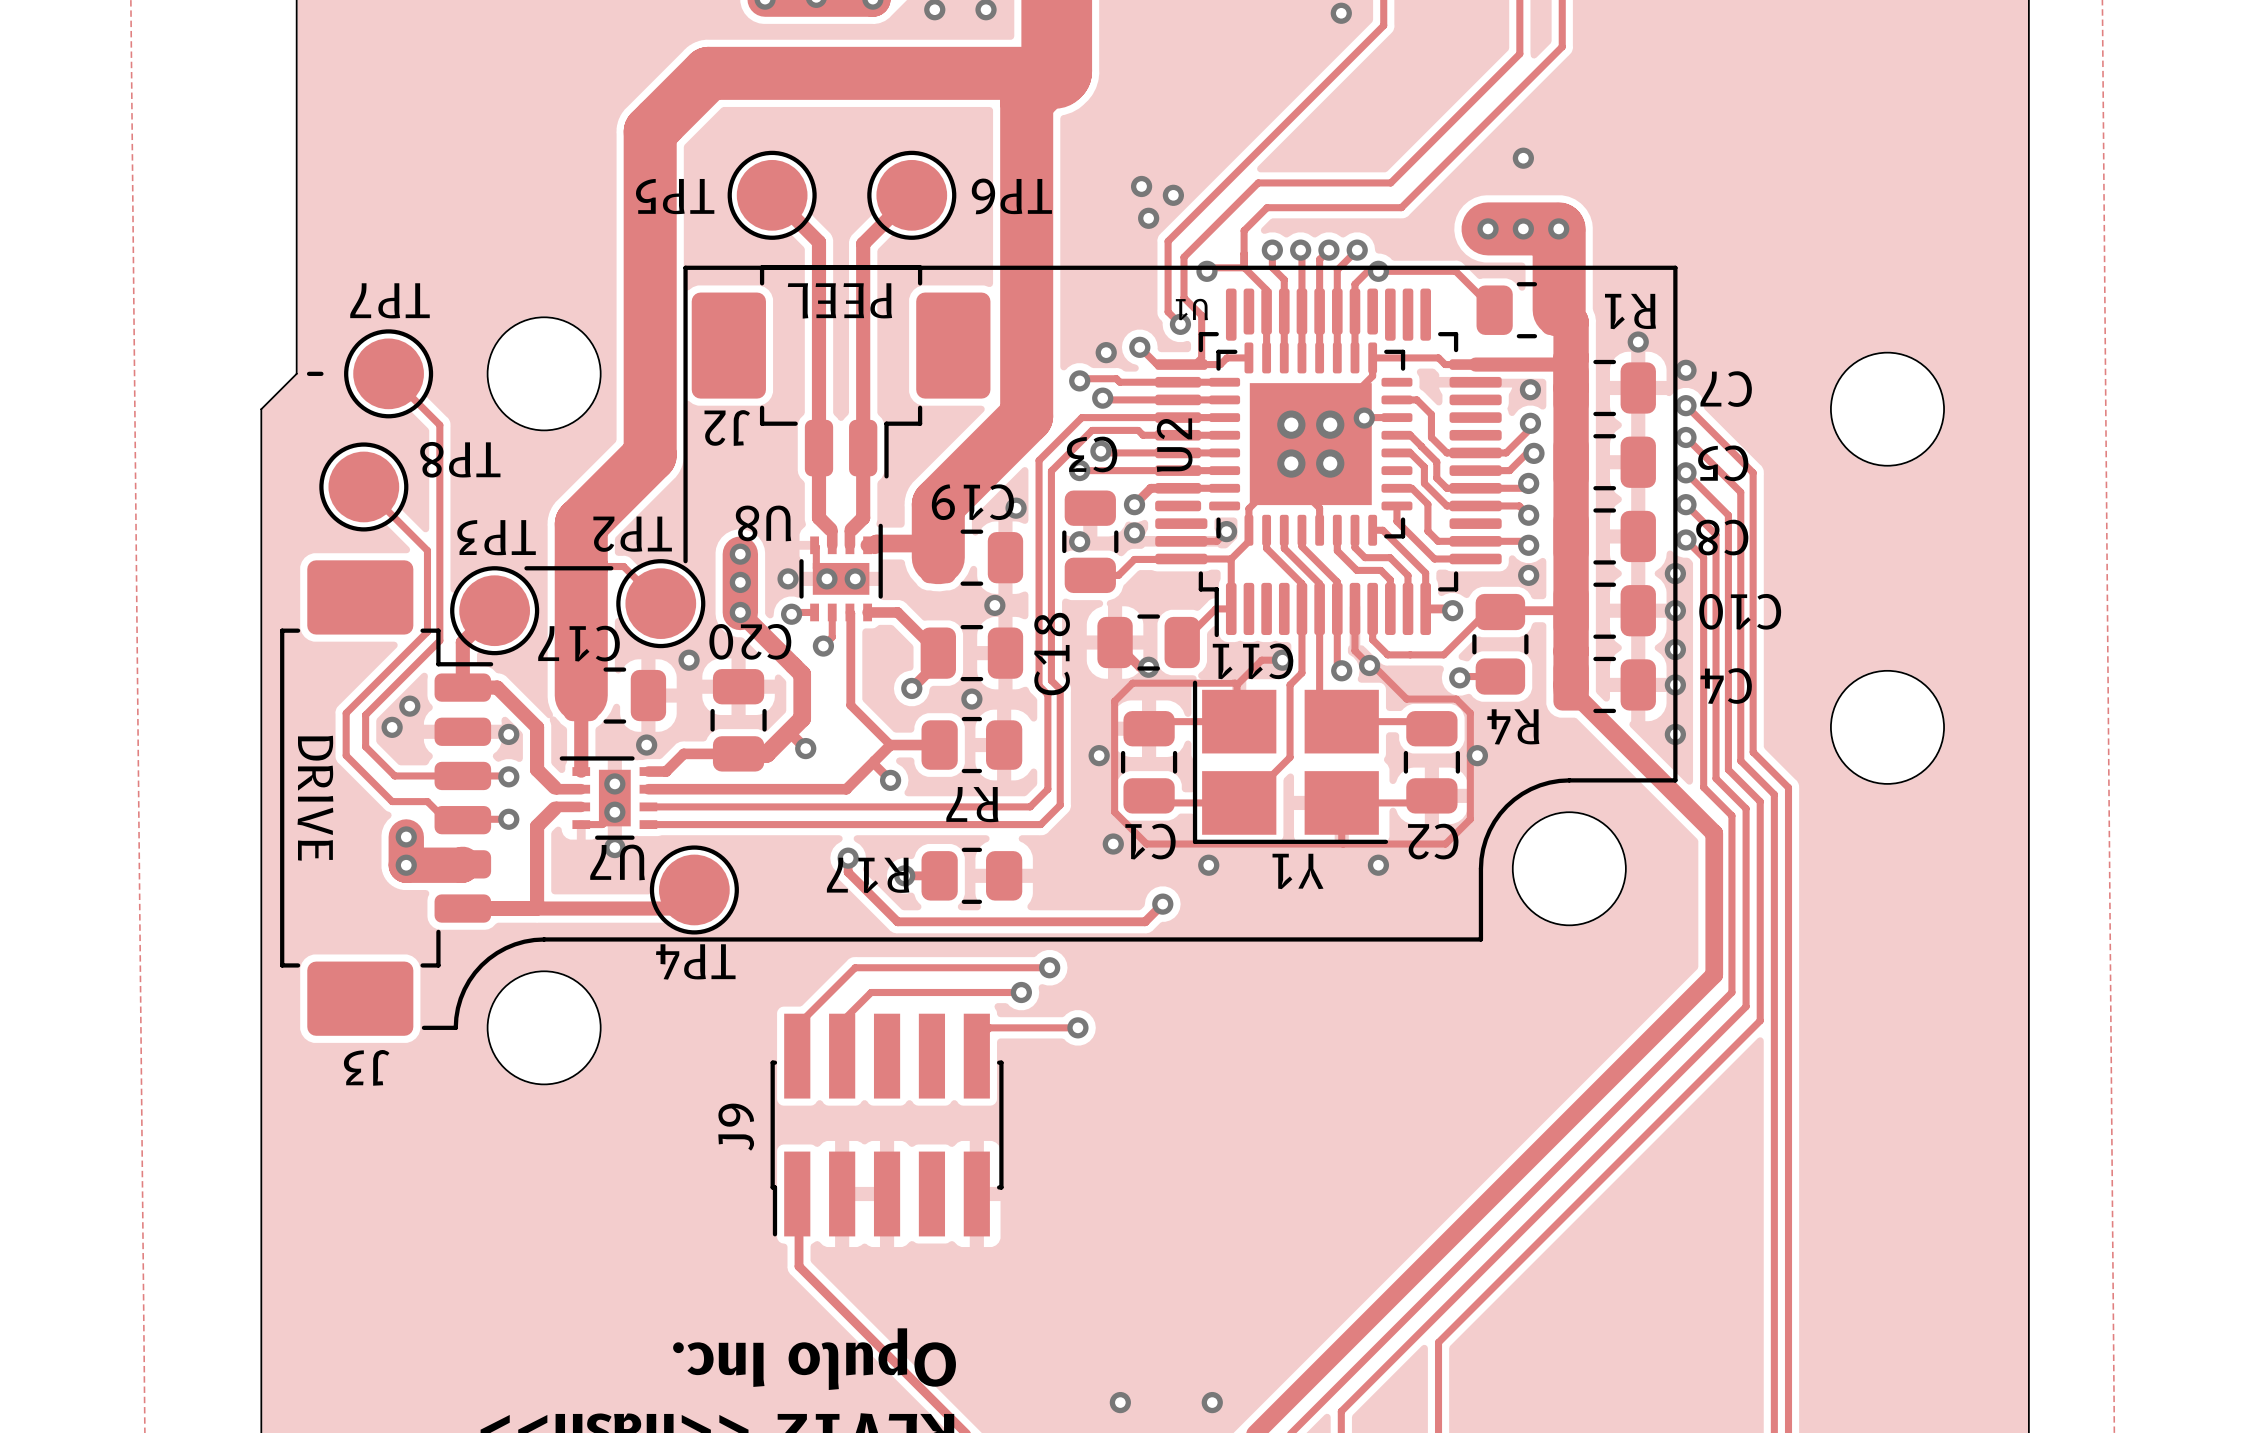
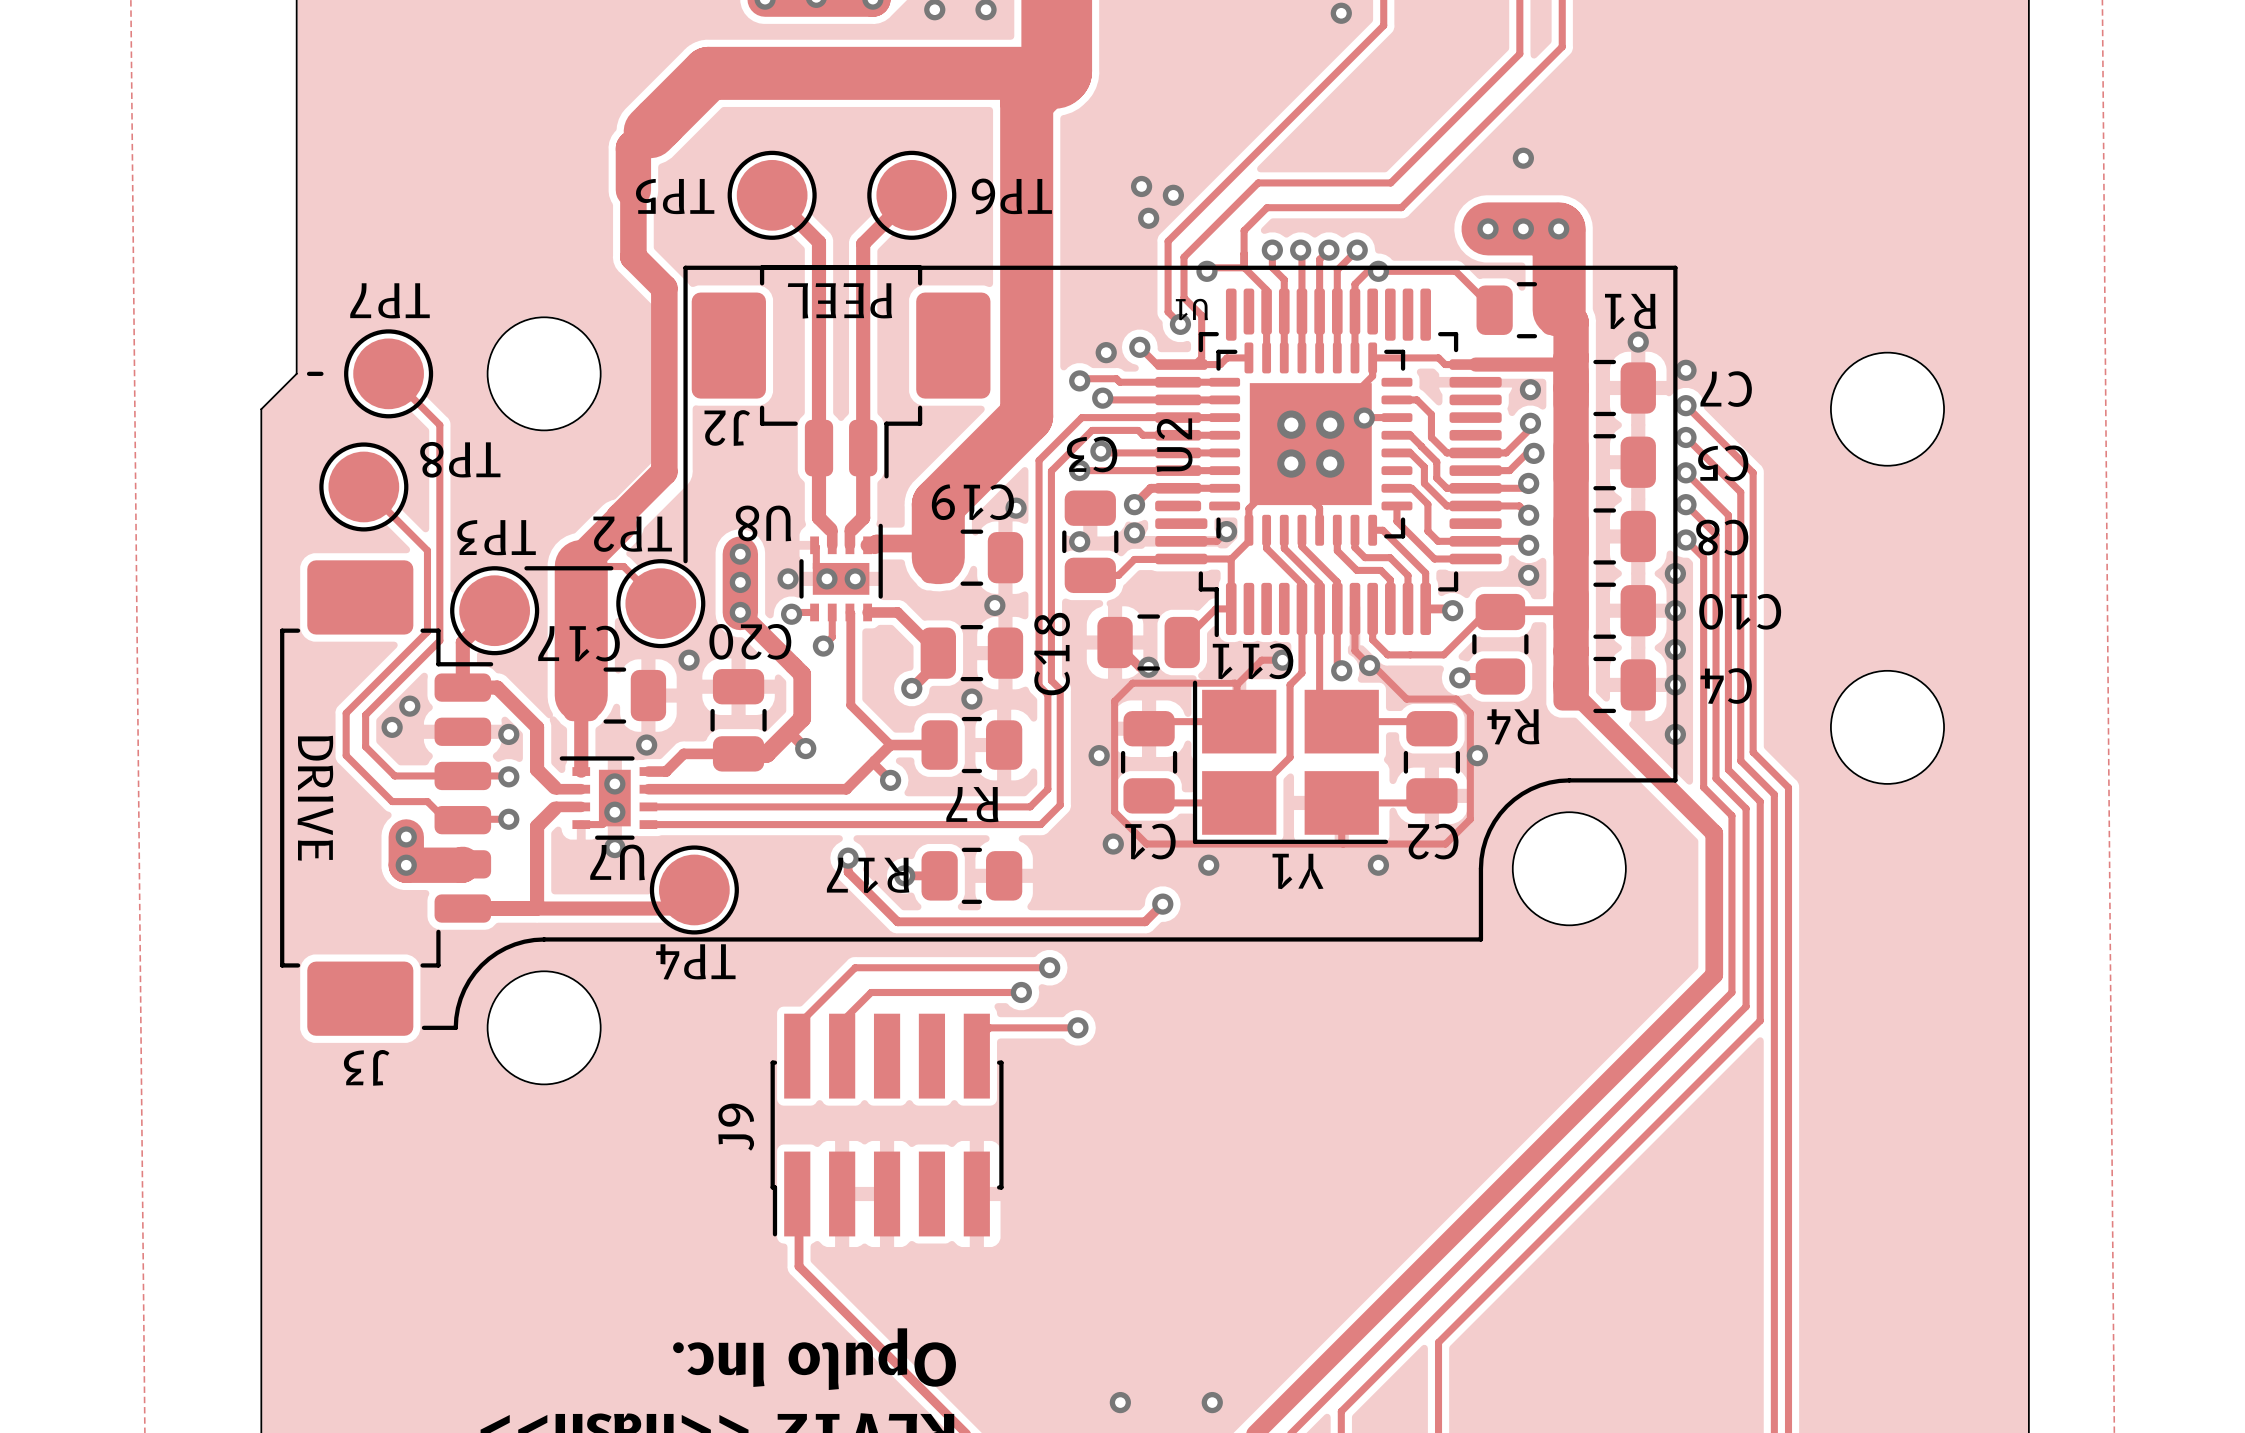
track: (650, 131) (650, 455) (581, 524) (581, 562) -> (650, 131) (633, 148) (633, 257) (664, 288) (664, 471) (619, 517) (619, 524) (581, 562)

